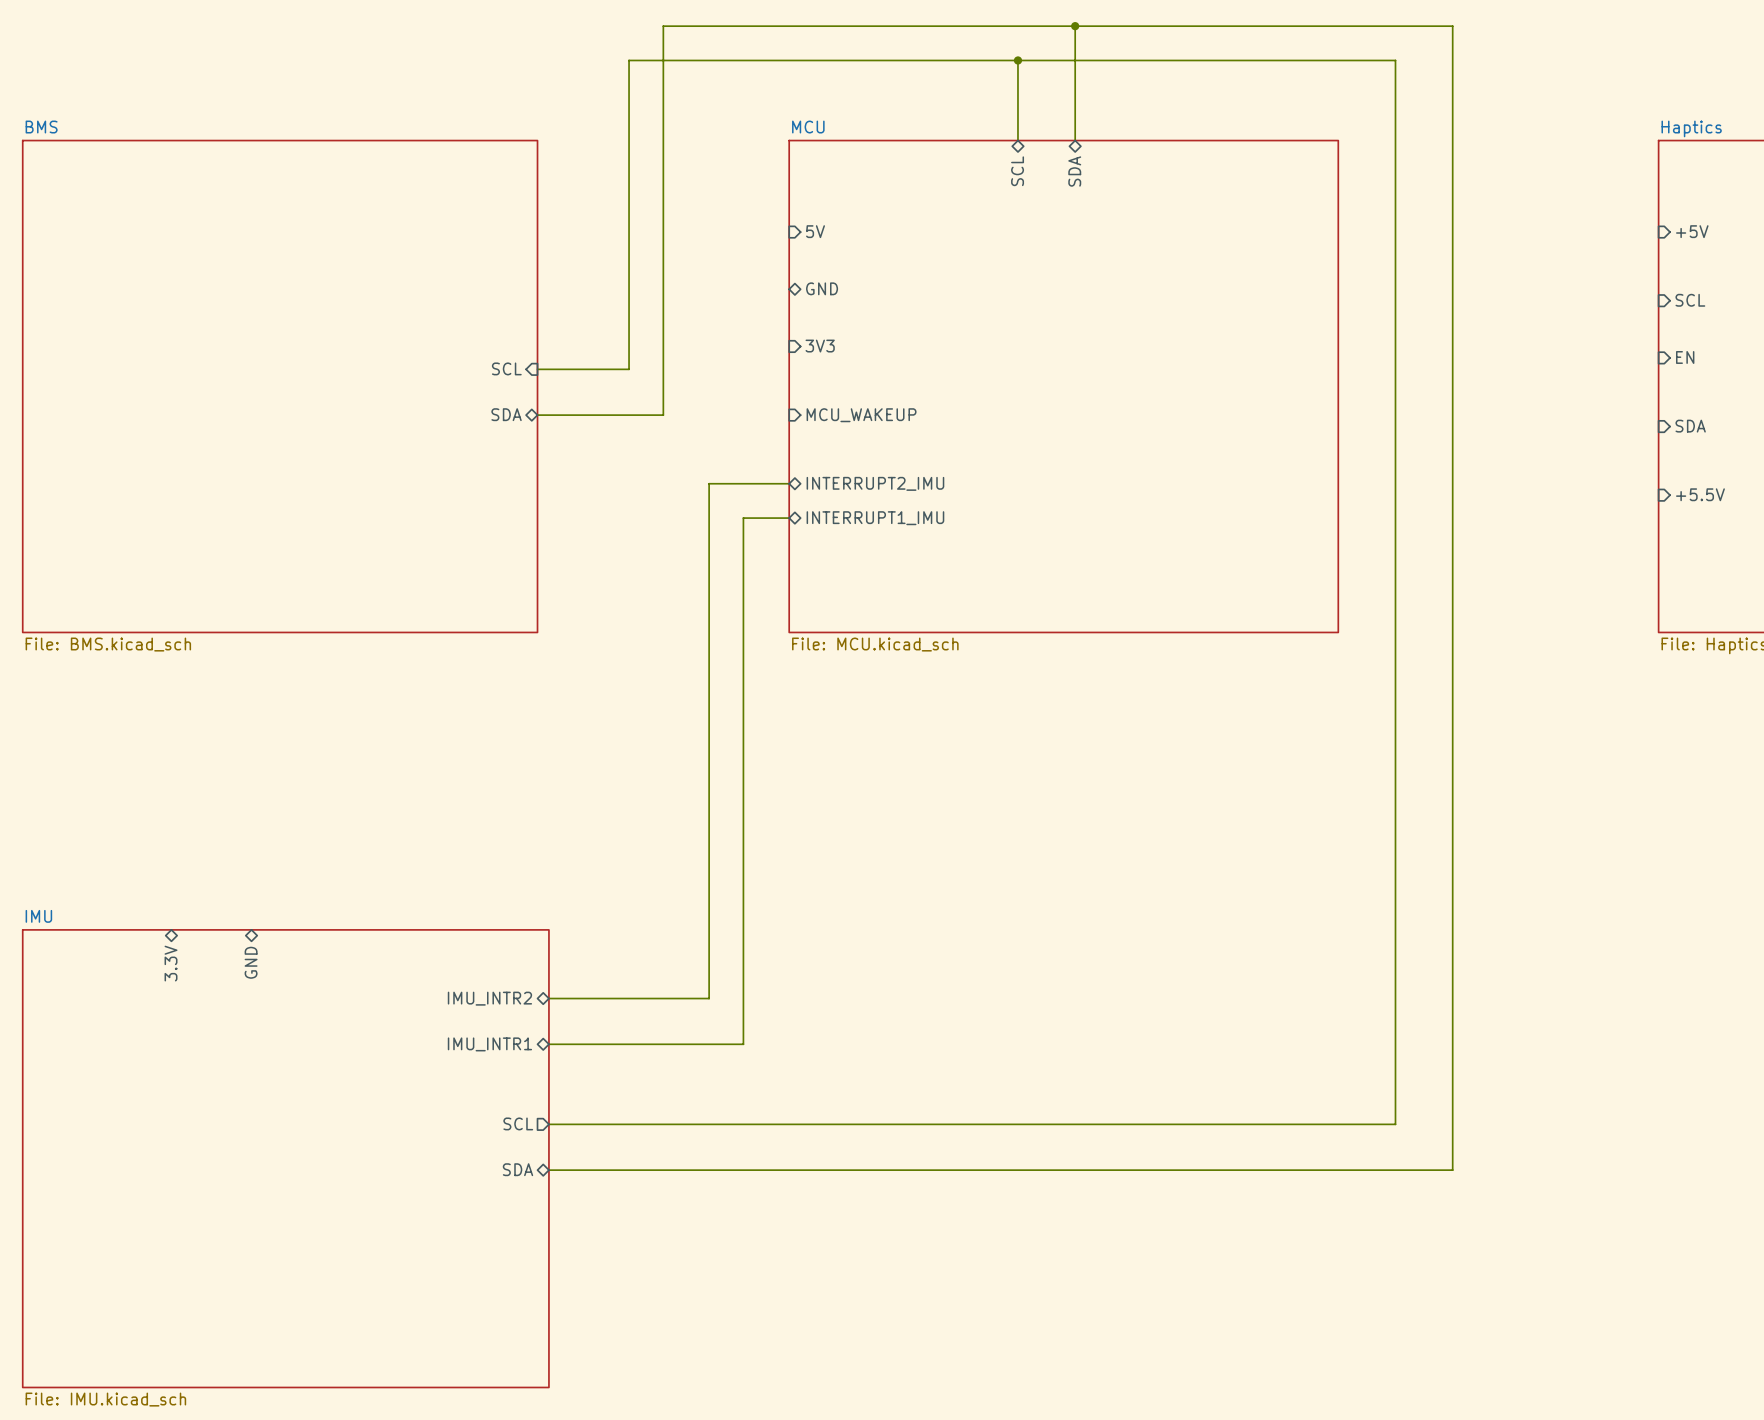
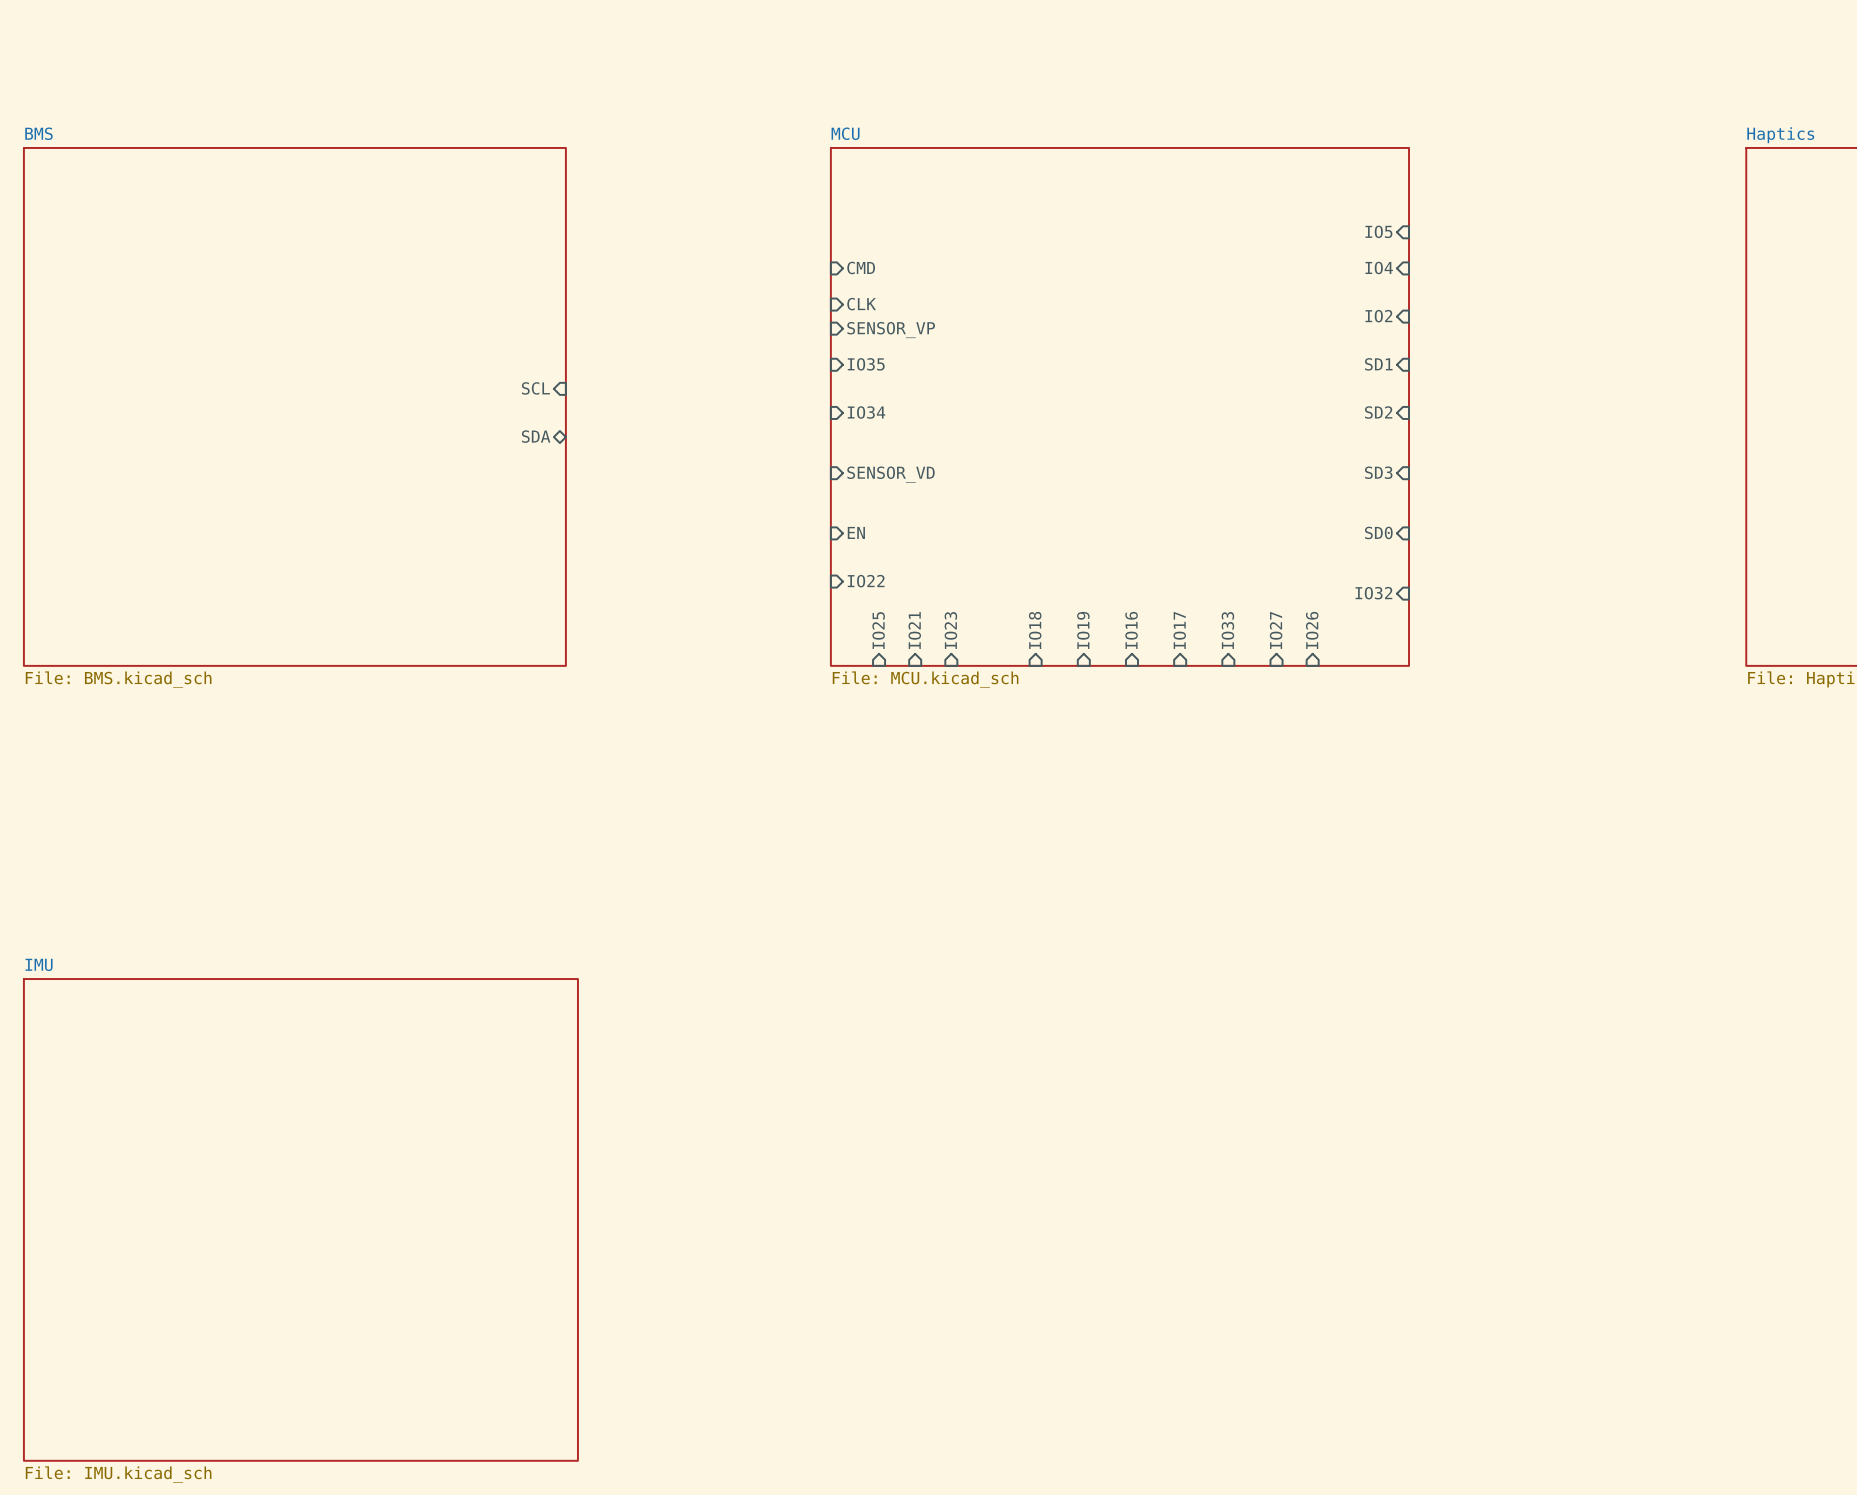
wire: (1075, 26) (1075, 140) -> none
junction: (1075, 26) -> none
wire: (1017, 60) (1017, 140) -> none
junction: (1017, 60) -> none
sheet pin: SCL (1017, 171) -> none
sheet pin: SDA (1074, 171) -> none
sheet pin: none -> IO5 (1378, 231)
sheet pin: 5V (815, 231) -> none
sheet pin: +5V (1692, 231) -> none
sheet pin: none -> CMD (861, 267)
sheet pin: none -> IO4 (1379, 267)
sheet pin shape: bidirectional (822, 288) -> input (861, 304)
sheet pin: GND (822, 288) -> CLK (861, 304)
sheet pin: none -> IO2 (1378, 316)
sheet pin: SCL (1690, 300) -> none
sheet pin: none -> SENSOR_VP (891, 330)
sheet pin: 3V3 (820, 346) -> IO35 (866, 364)
sheet pin: none -> SD1 (1378, 364)
sheet pin: EN (1685, 357) -> none
wire: (537, 369) (629, 369) (629, 60) (1395, 60) (1395, 1124) (548, 1124) -> none
sheet pin: none -> IO34 (866, 412)
sheet pin: none -> SD2 (1378, 412)
wire: (537, 415) (663, 415) (663, 26) (1452, 26) (1452, 1170) (548, 1170) -> none
sheet pin: MCU_WAKEUP (861, 415) -> none
sheet pin: SDA (1690, 426) -> none
sheet pin: none -> SENSOR_VD (890, 474)
sheet pin: none -> SD3 (1378, 472)
wire: (789, 483) (709, 483) (709, 998) (548, 998) -> none
sheet pin: INTERRUPT2_IMU (875, 483) -> none
sheet pin: +5.5V (1700, 494) -> none
sheet pin: none -> EN (856, 532)
sheet pin: none -> SD0 (1378, 532)
wire: (789, 518) (743, 518) (743, 1044) (548, 1044) -> none
sheet pin: INTERRUPT1_IMU (875, 518) -> none
sheet pin: none -> IO22 (866, 581)
sheet pin: none -> IO32 (1373, 593)
sheet pin: none -> IO17 (1179, 630)
sheet pin: none -> IO27 (1276, 630)
sheet pin: none -> IO25 (878, 630)
sheet pin: none -> IO21 (914, 630)
sheet pin: none -> IO23 (950, 630)
sheet pin: none -> IO18 (1035, 630)
sheet pin: none -> IO19 (1083, 630)
sheet pin: none -> IO16 (1131, 630)
sheet pin: none -> IO33 (1227, 630)
sheet pin: none -> IO26 (1312, 630)
sheet pin: GND (251, 962) -> none
sheet pin: 3.3V (171, 963) -> none
sheet pin: IMU_INTR2 (489, 998) -> none
sheet pin: IMU_INTR1 (489, 1044) -> none
sheet pin: SCL (518, 1123) -> none
sheet pin: SDA (517, 1169) -> none

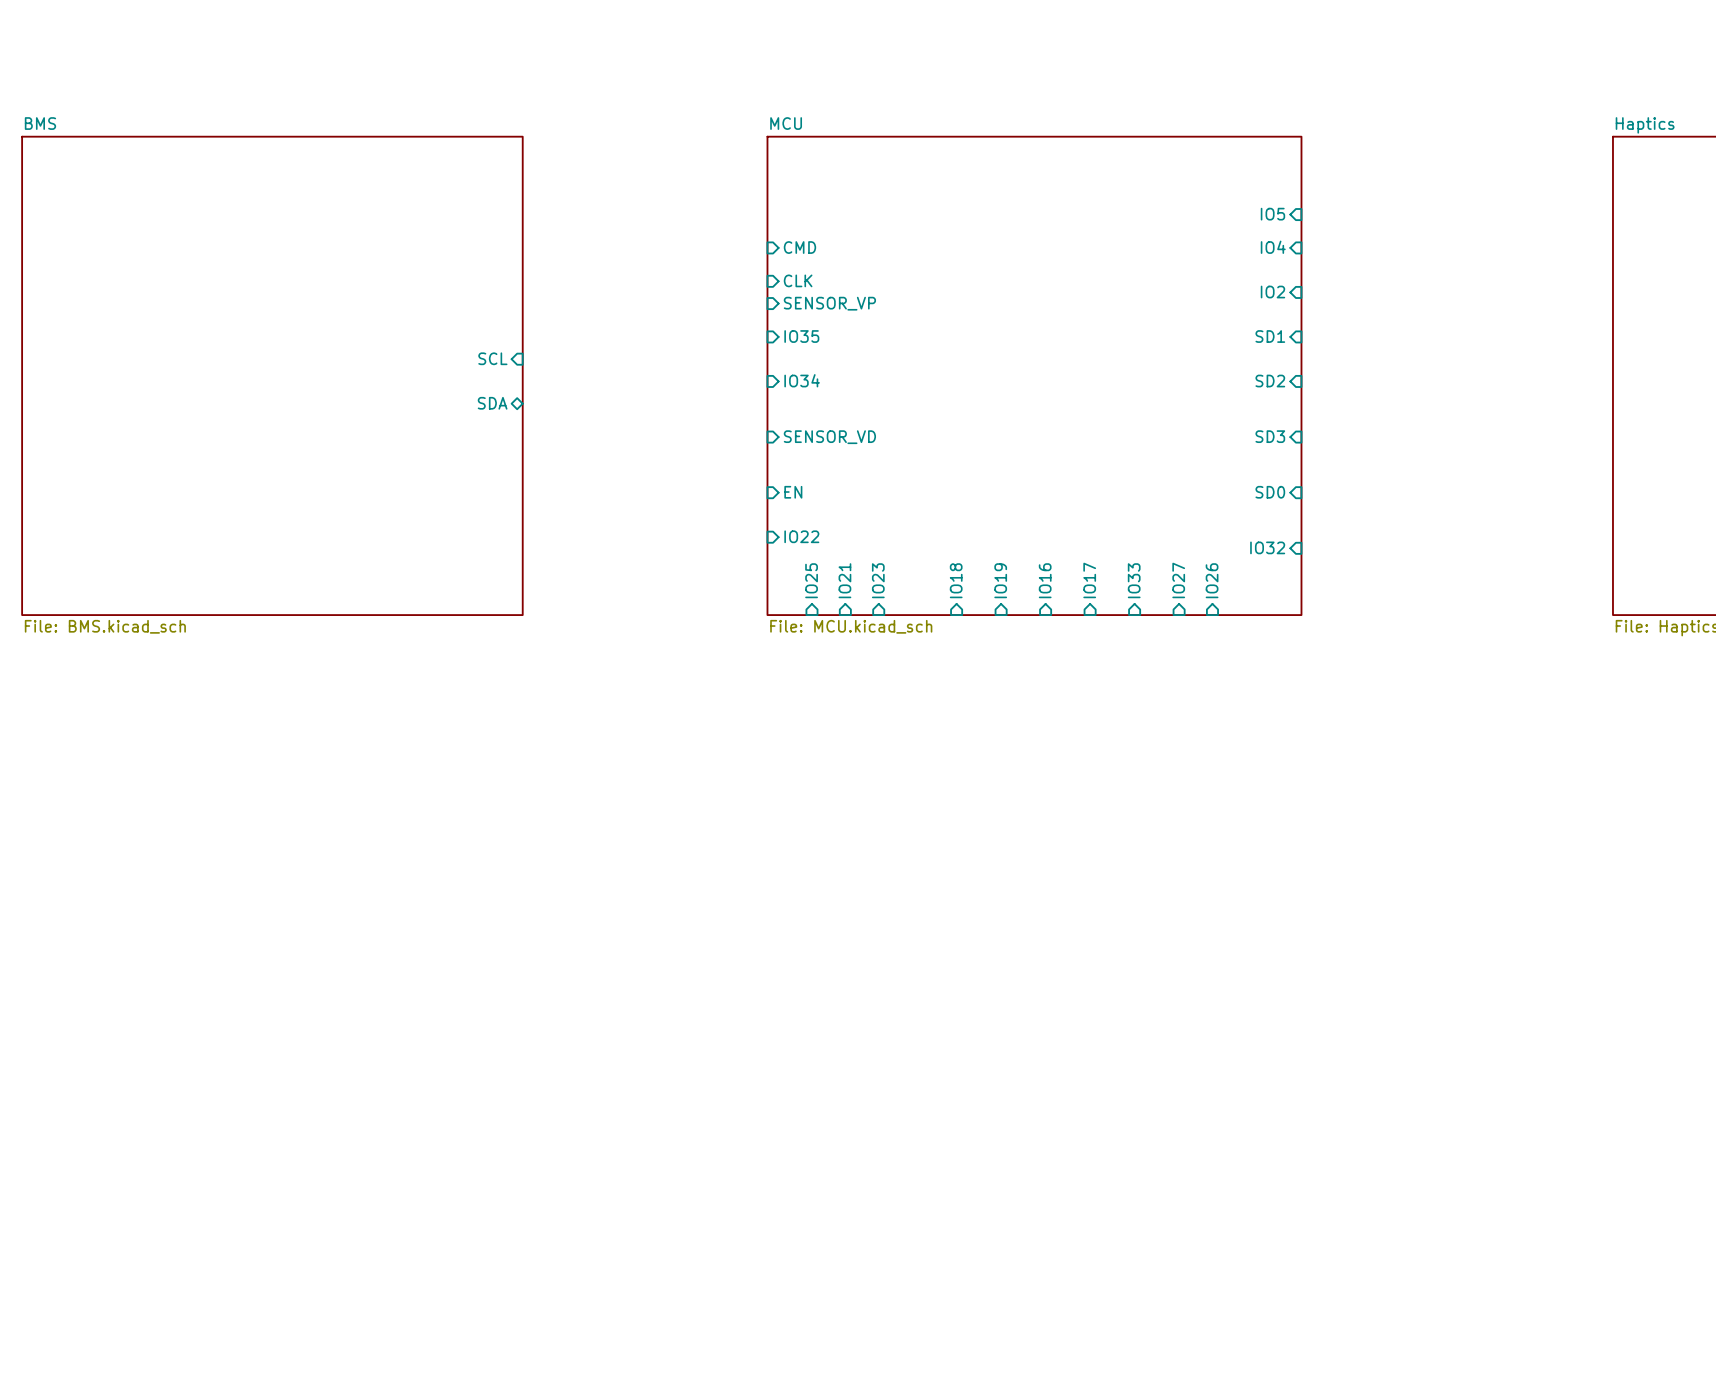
sheet IMU: File: IMU.kicad_sch (300, 1219) -> none

